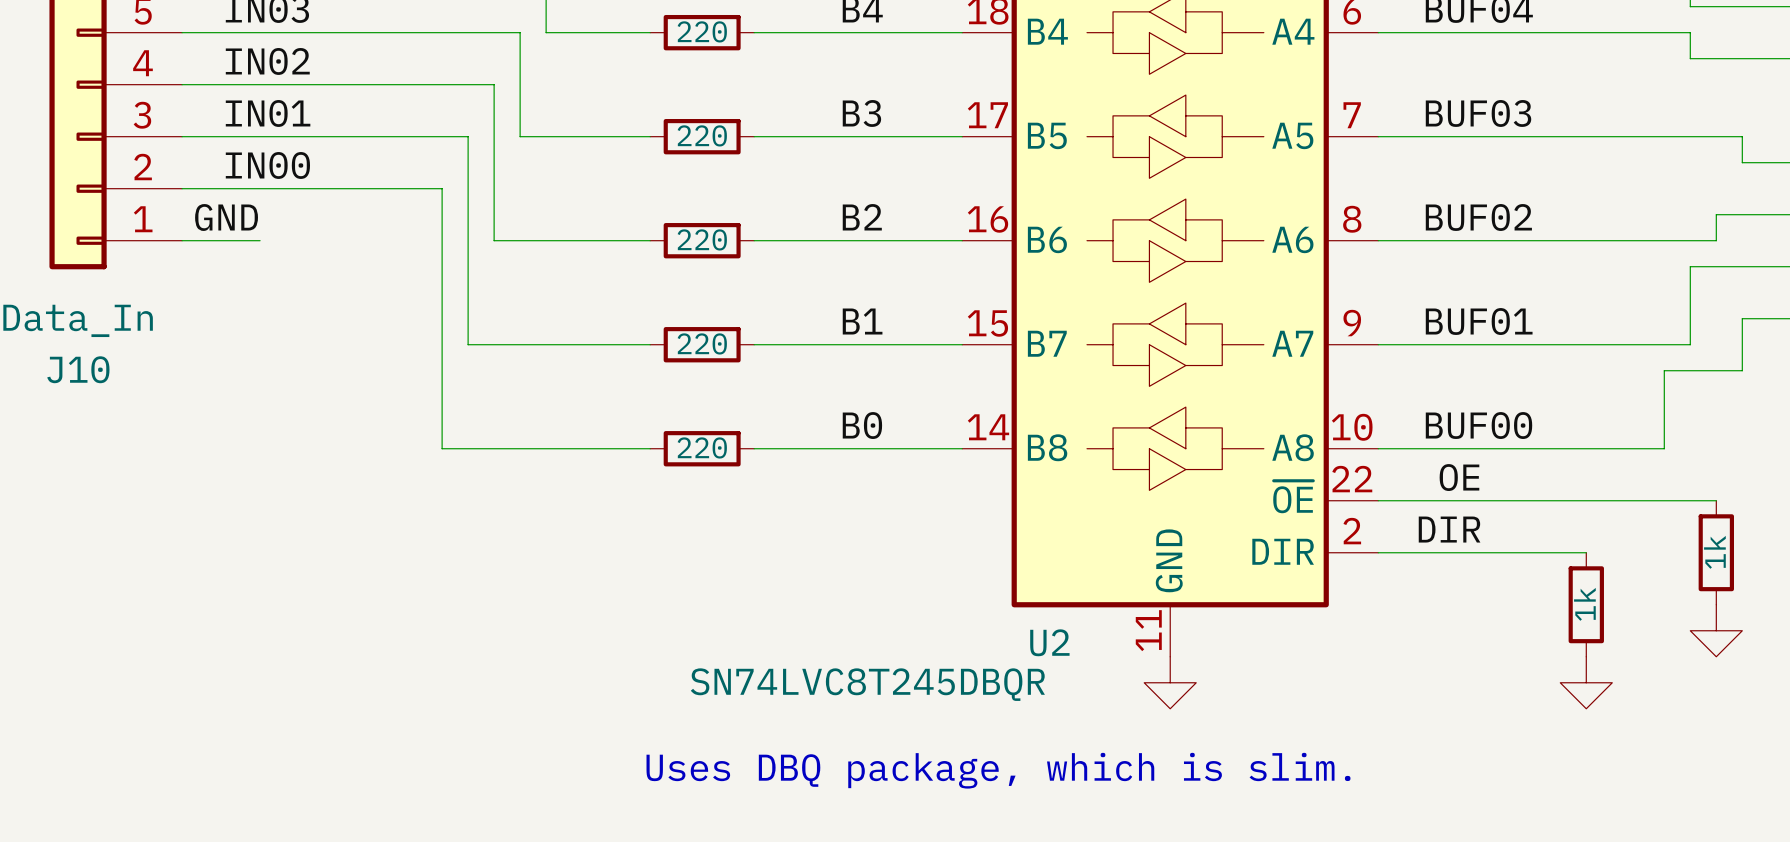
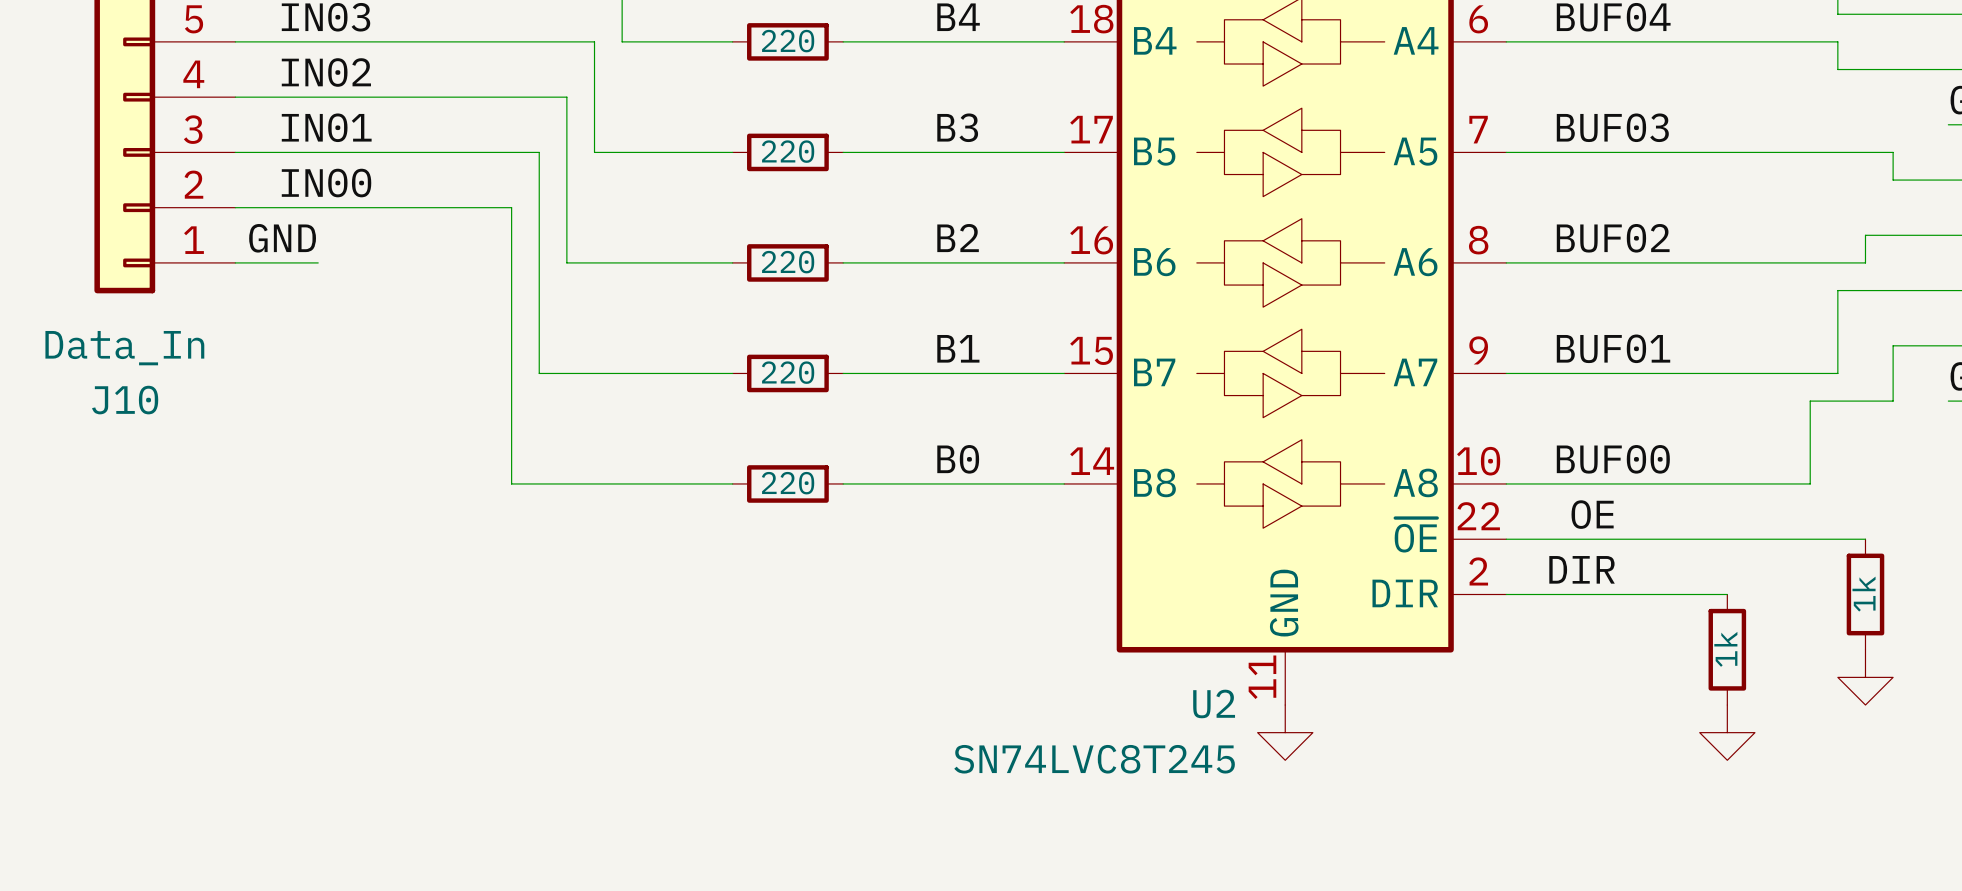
U2 name position: U2 (1049, 642) -> U2 (1214, 703)
U2 value: SN74LVC8T245DBQR (867, 684) -> SN74LVC8T245 (1094, 759)
text: Uses DBQ package, which is slim. (998, 770) -> none

